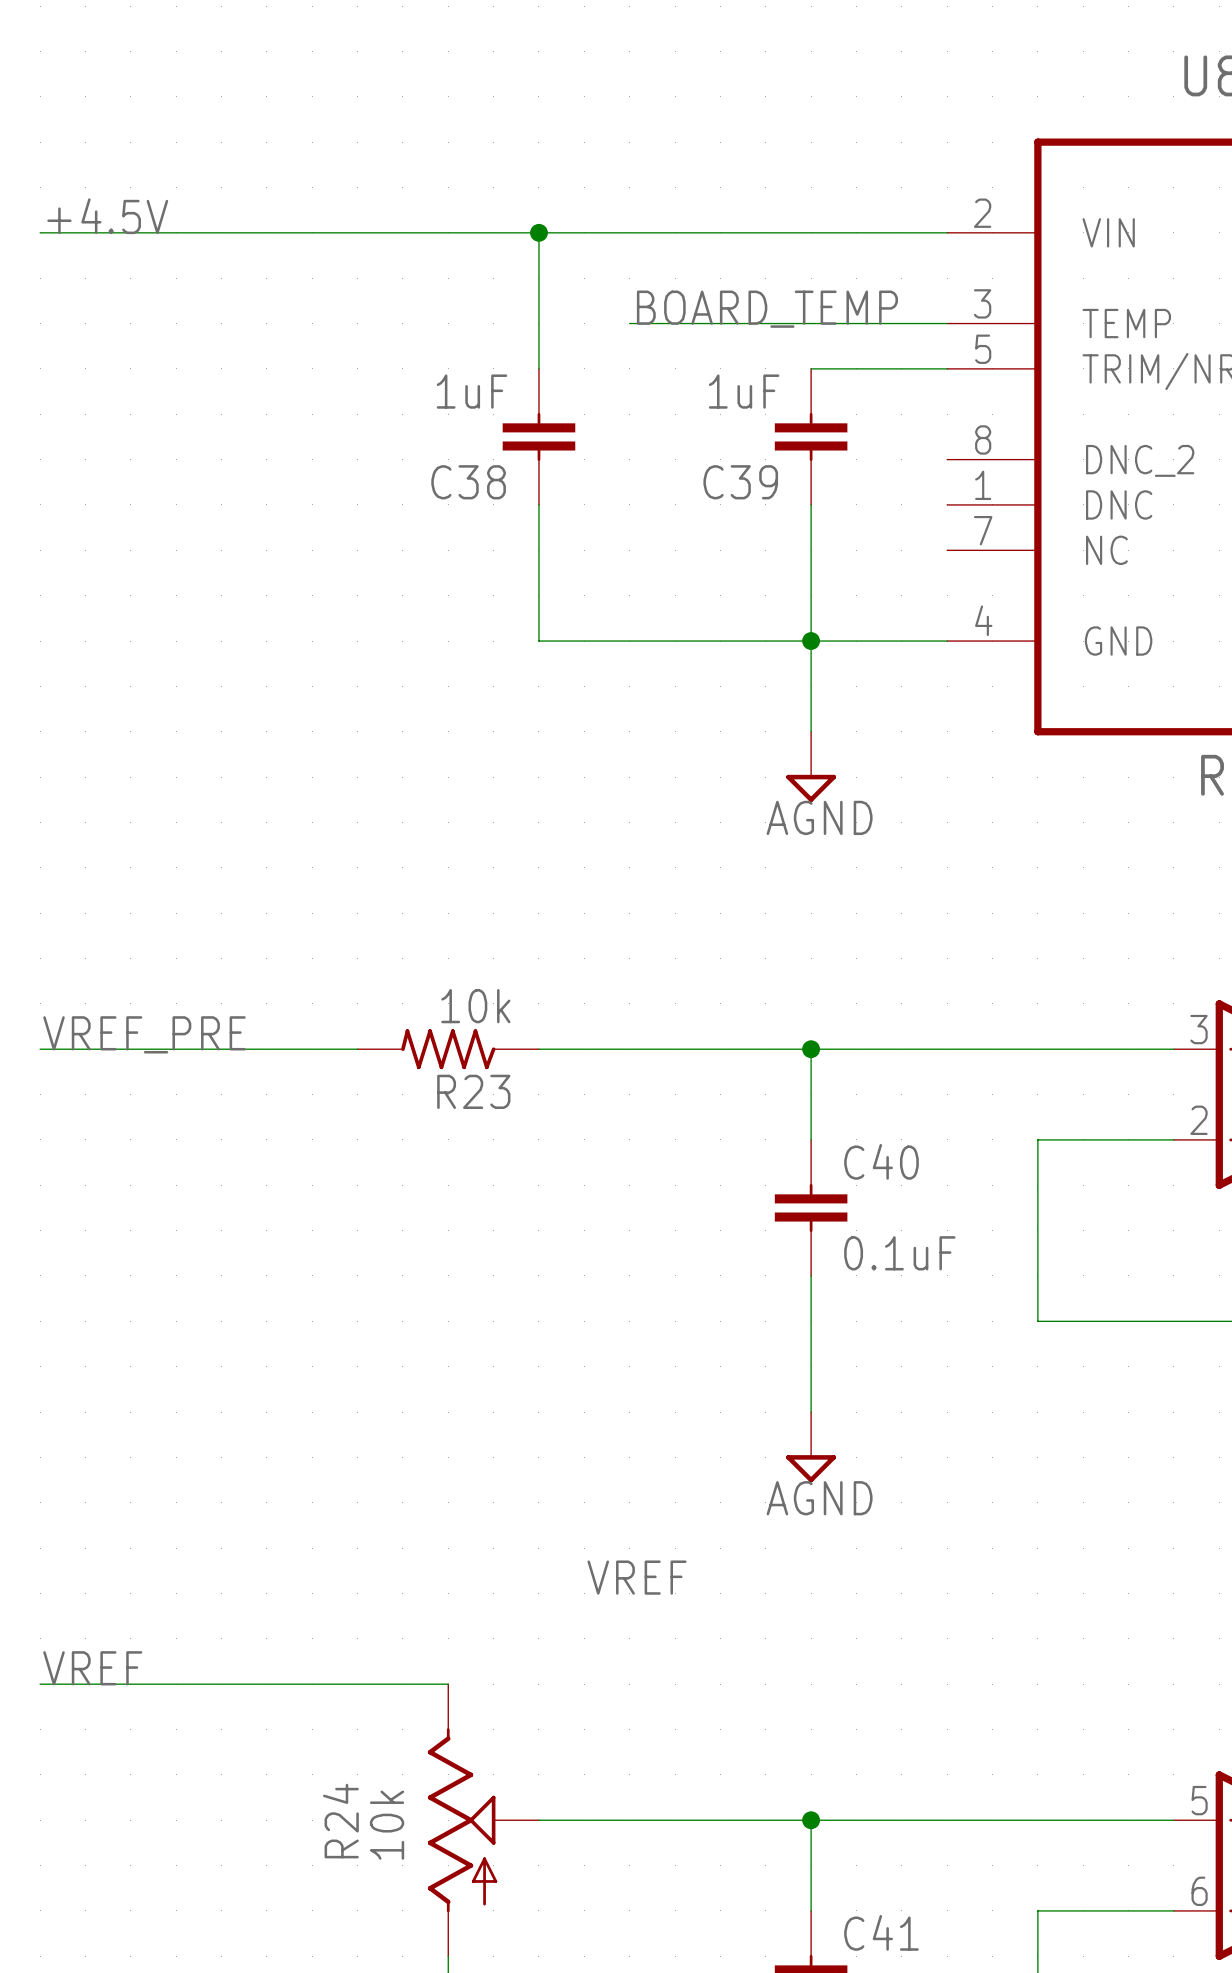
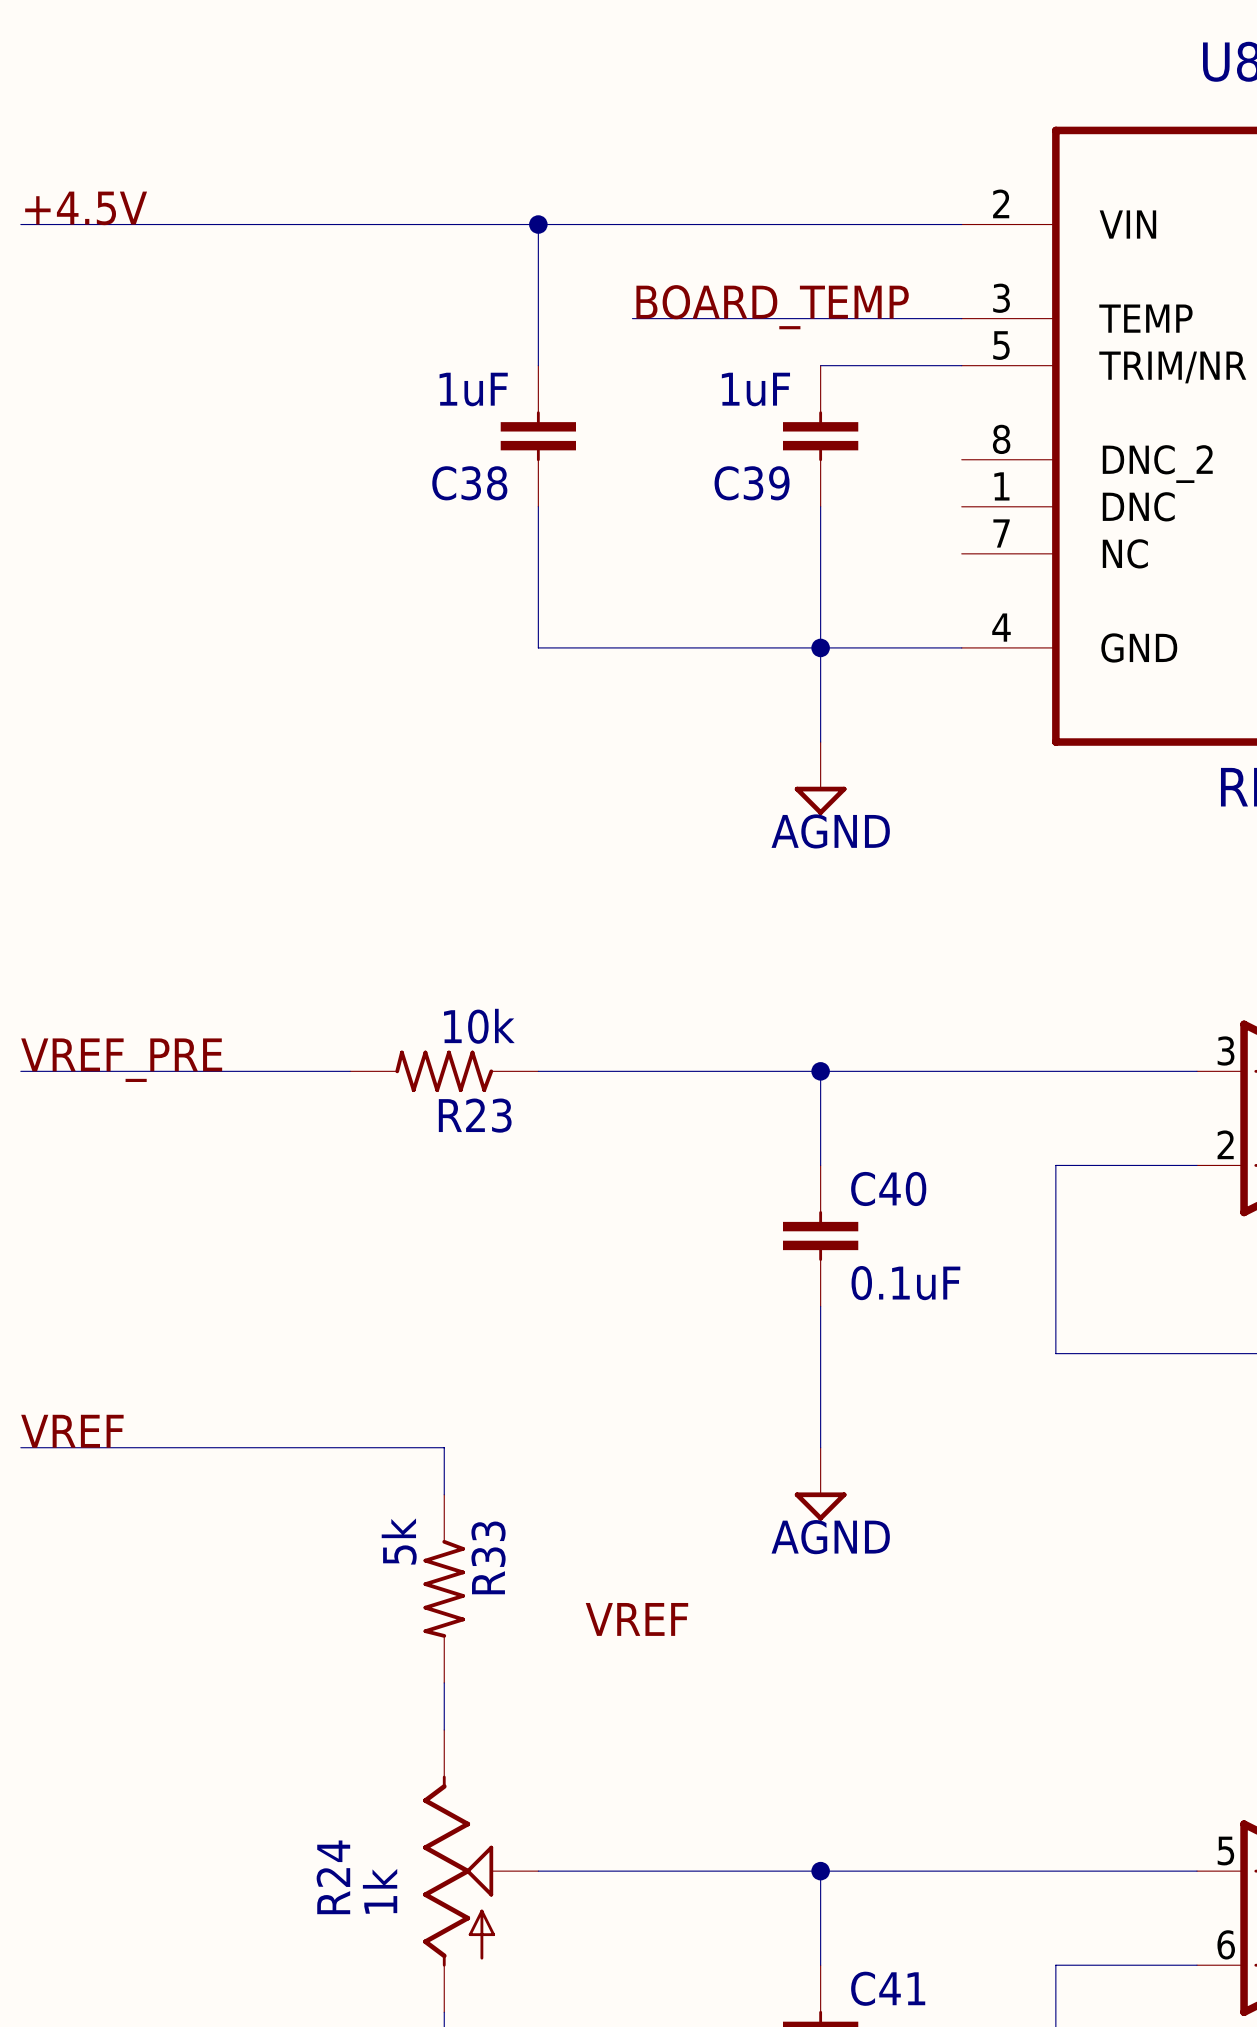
wire: none -> (20, 1447) (444, 1447) (444, 1494)
R33: none -> 5k (444, 1588)
label position: VREF (92, 1668) -> VREF (72, 1431)
wire: (40, 1684) (448, 1684) -> (444, 1682) (444, 1729)
R24 value: 10k (387, 1825) -> 1k (380, 1891)

